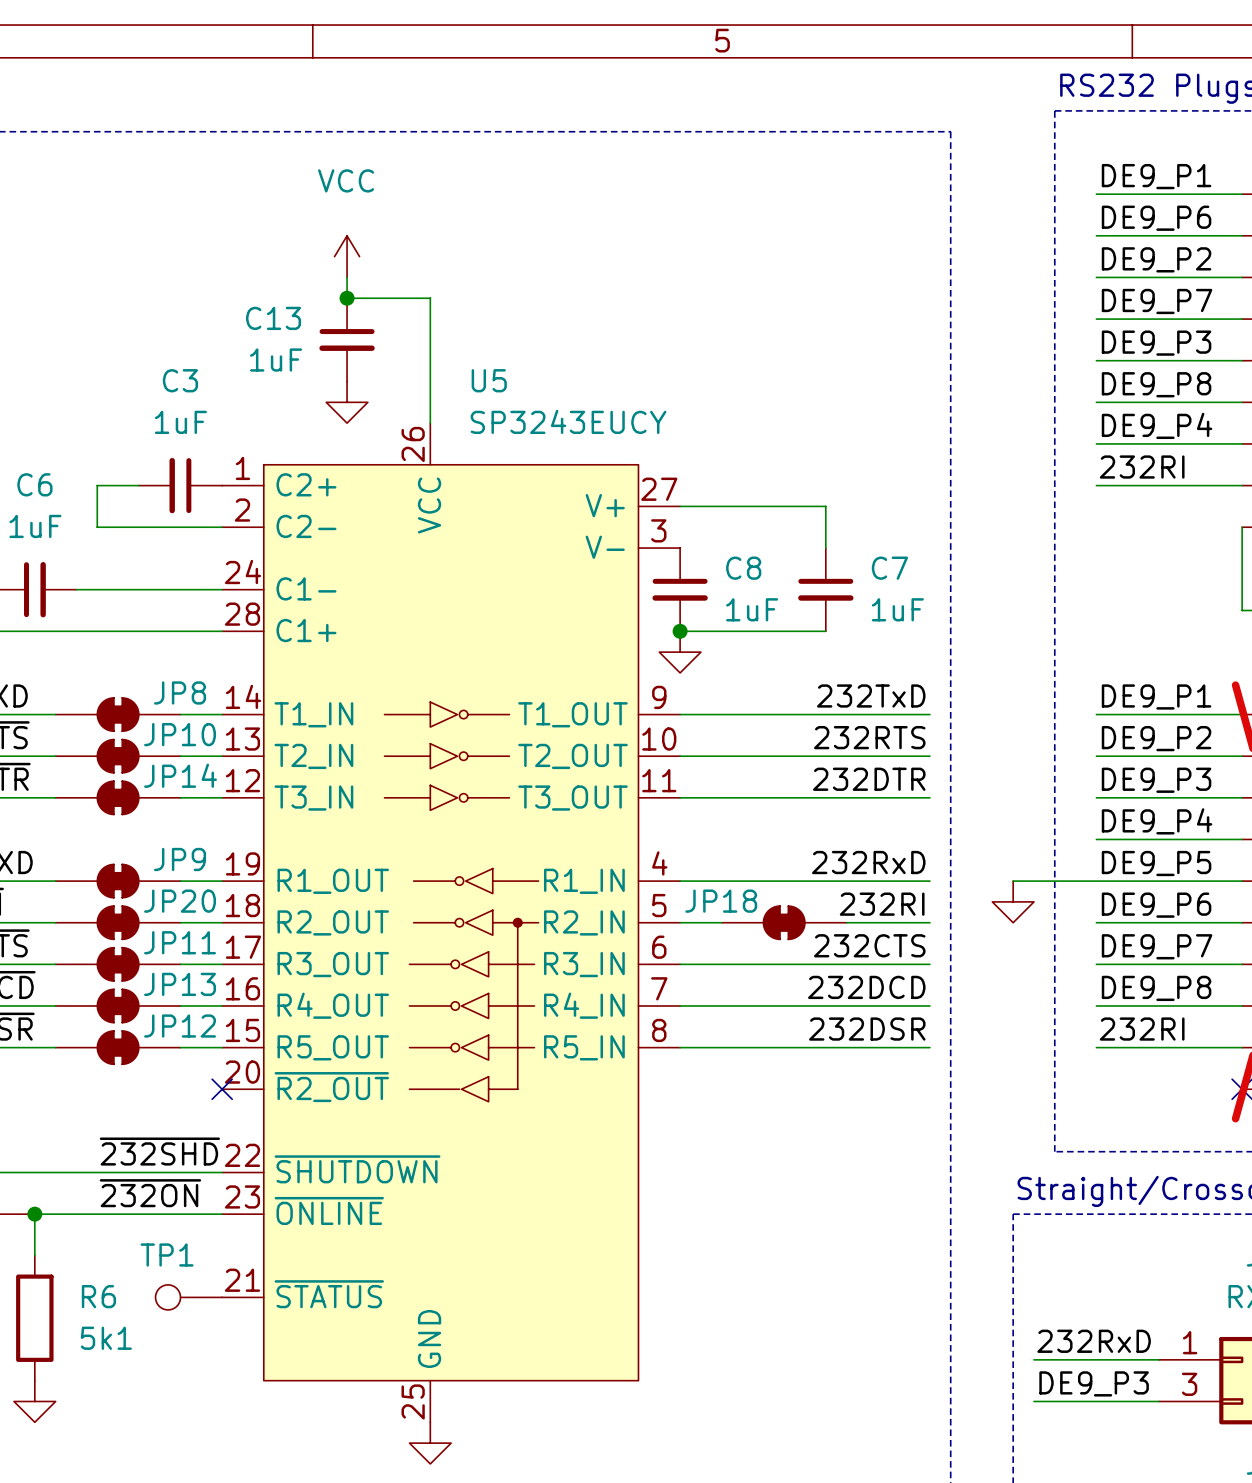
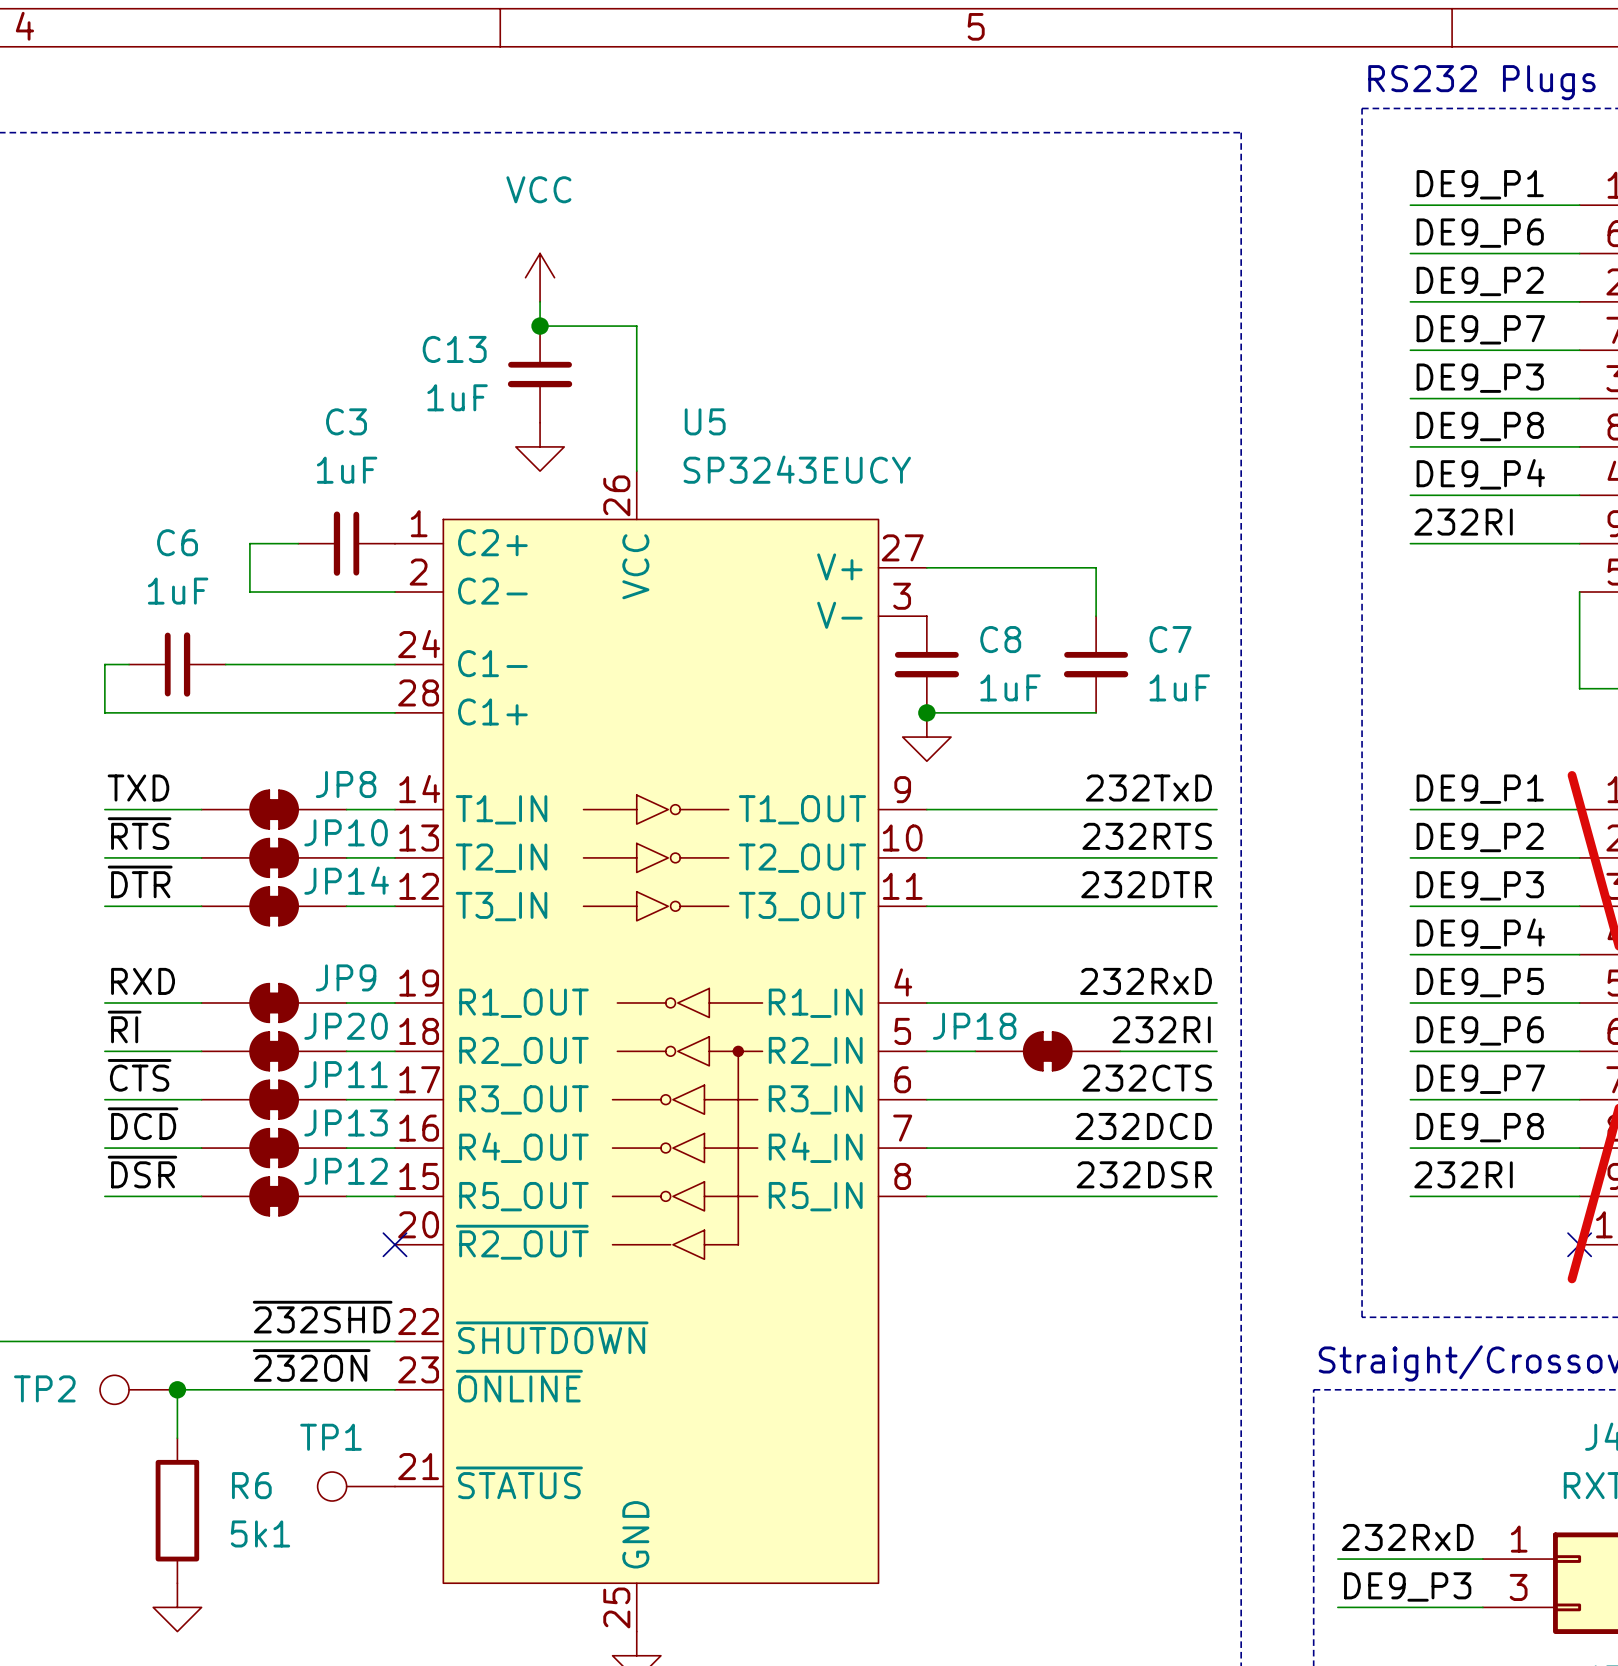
wire: (1013, 881) (1096, 881) -> none
power symbol: (1013, 901) -> none

